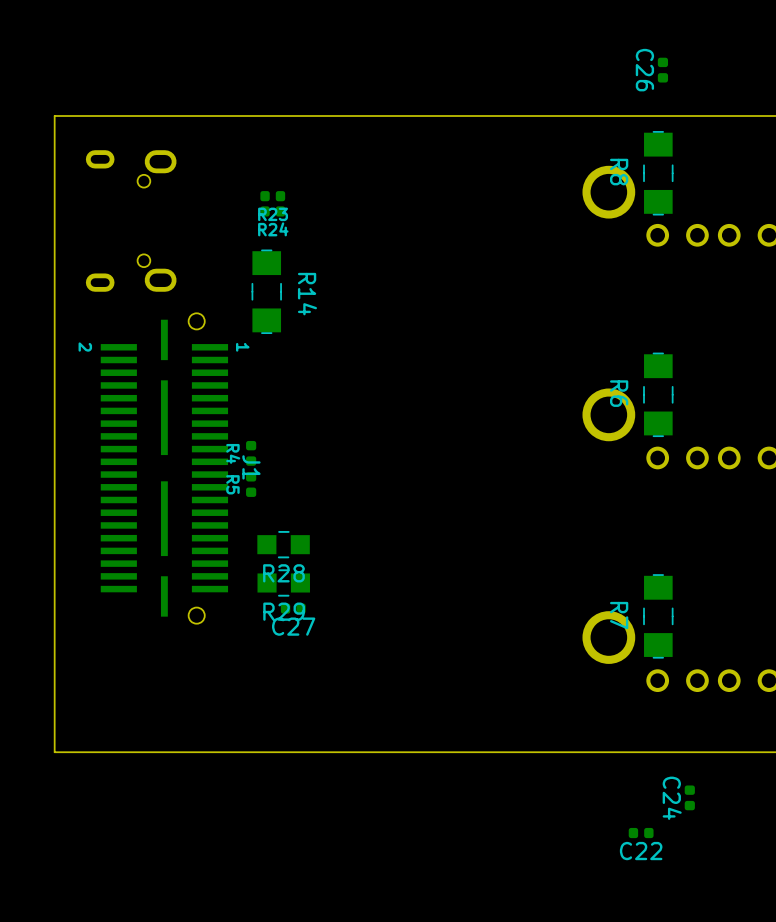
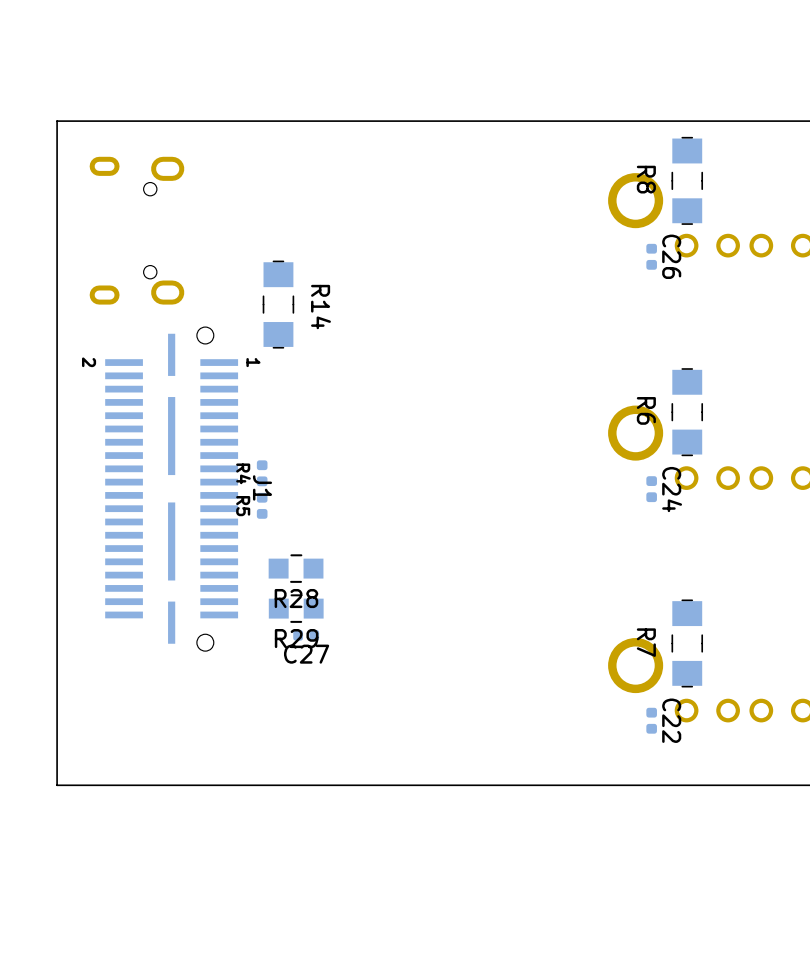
C26 name position: C26 (644, 70) -> C26 (671, 256)
C26 position: (662, 70) -> (651, 256)
R23: (272, 196) -> none
R24: (272, 211) -> none
C24 position: (689, 797) -> (651, 489)
C24 name position: C24 (672, 798) -> C24 (672, 489)
C22 rotation: 0° (641, 833) -> 90° clockwise (651, 720)
C22 position: (641, 833) -> (651, 720)

